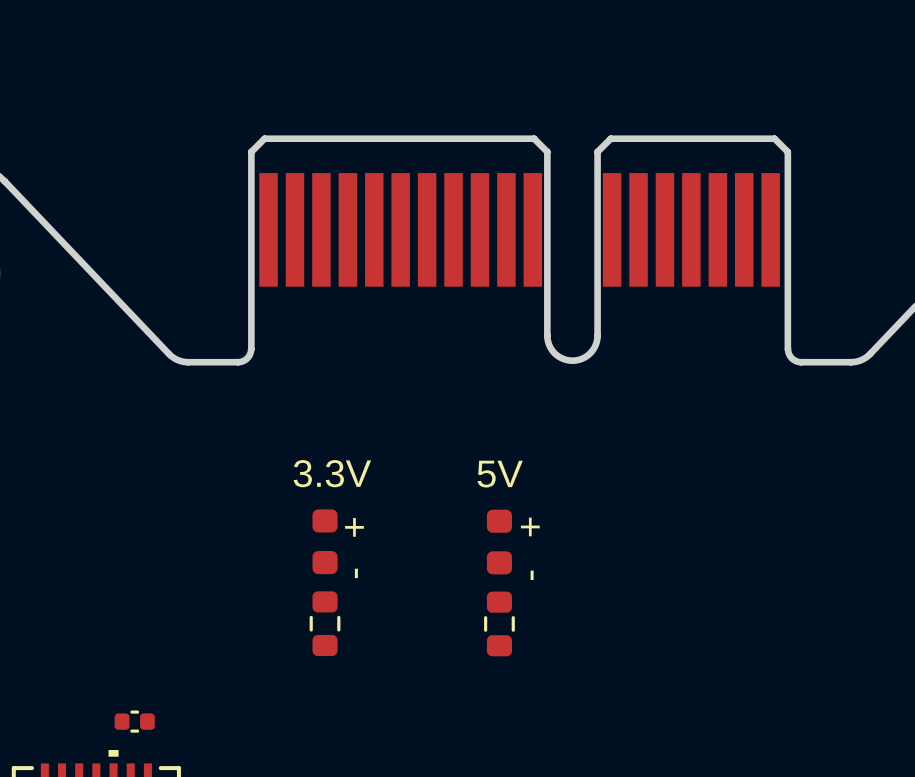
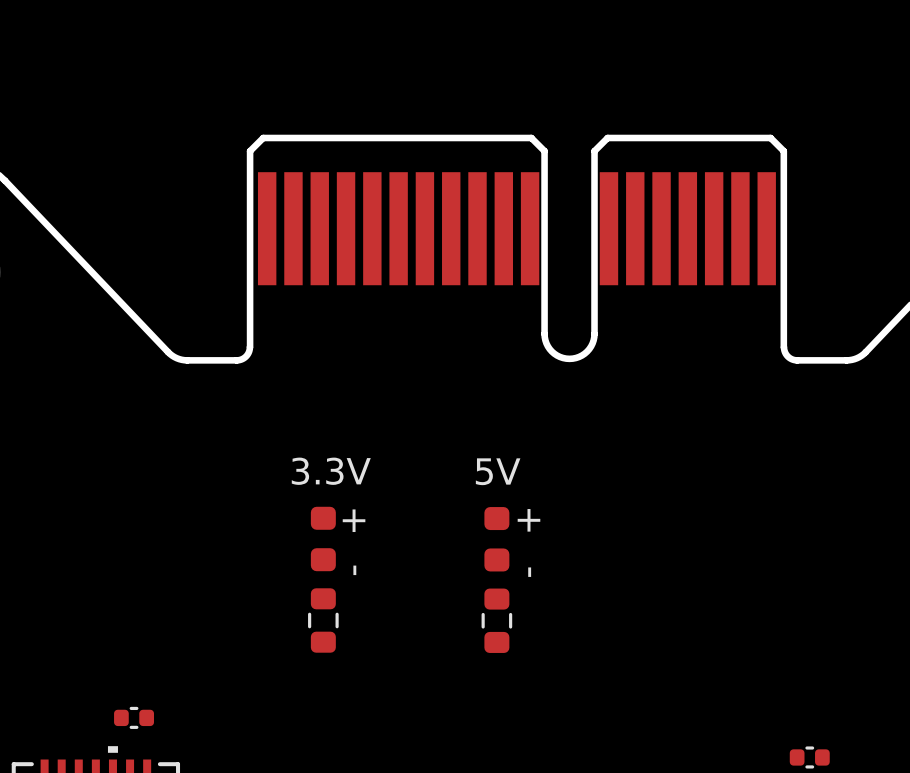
part: none -> (809, 757)

